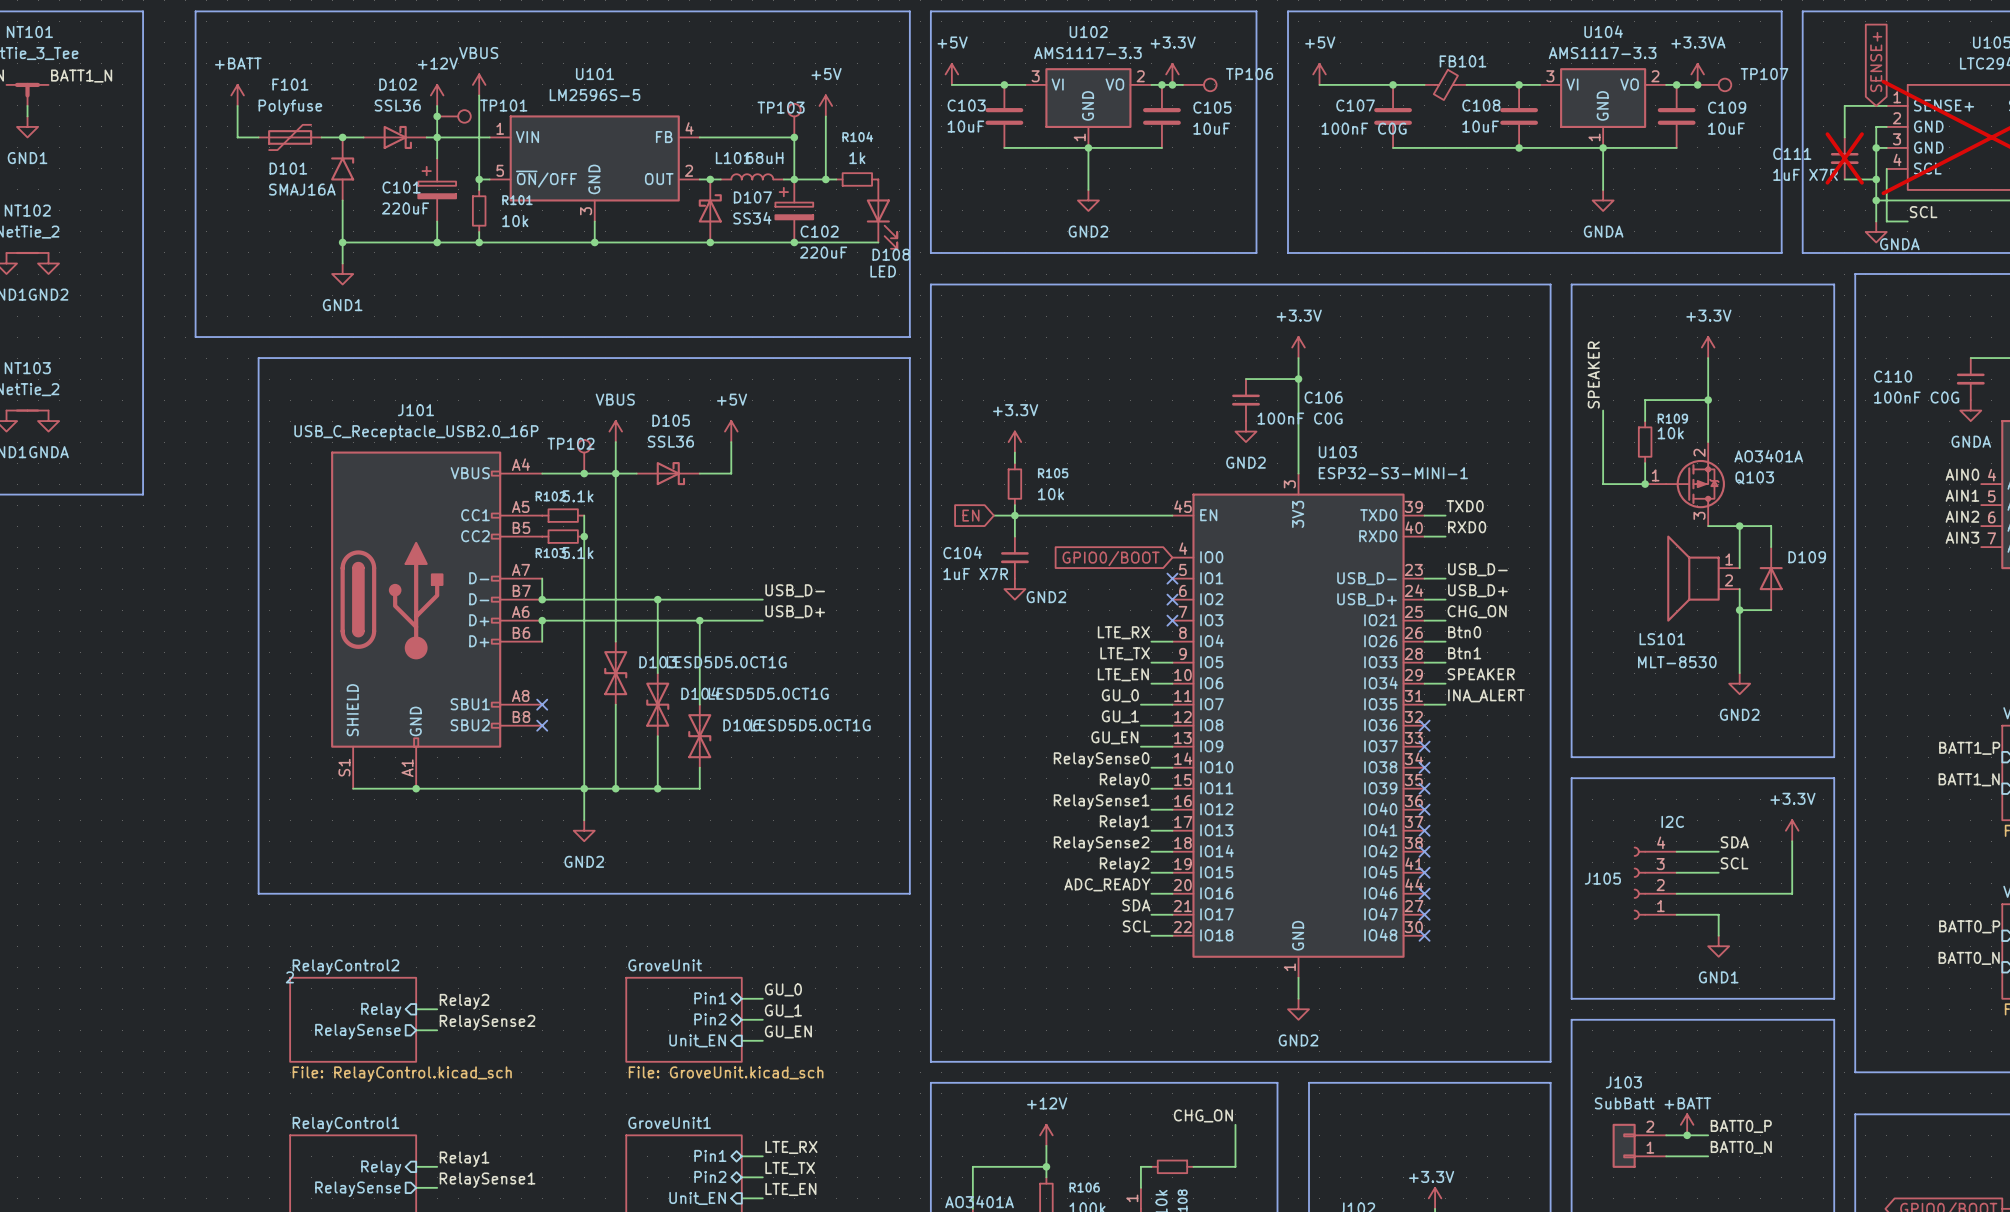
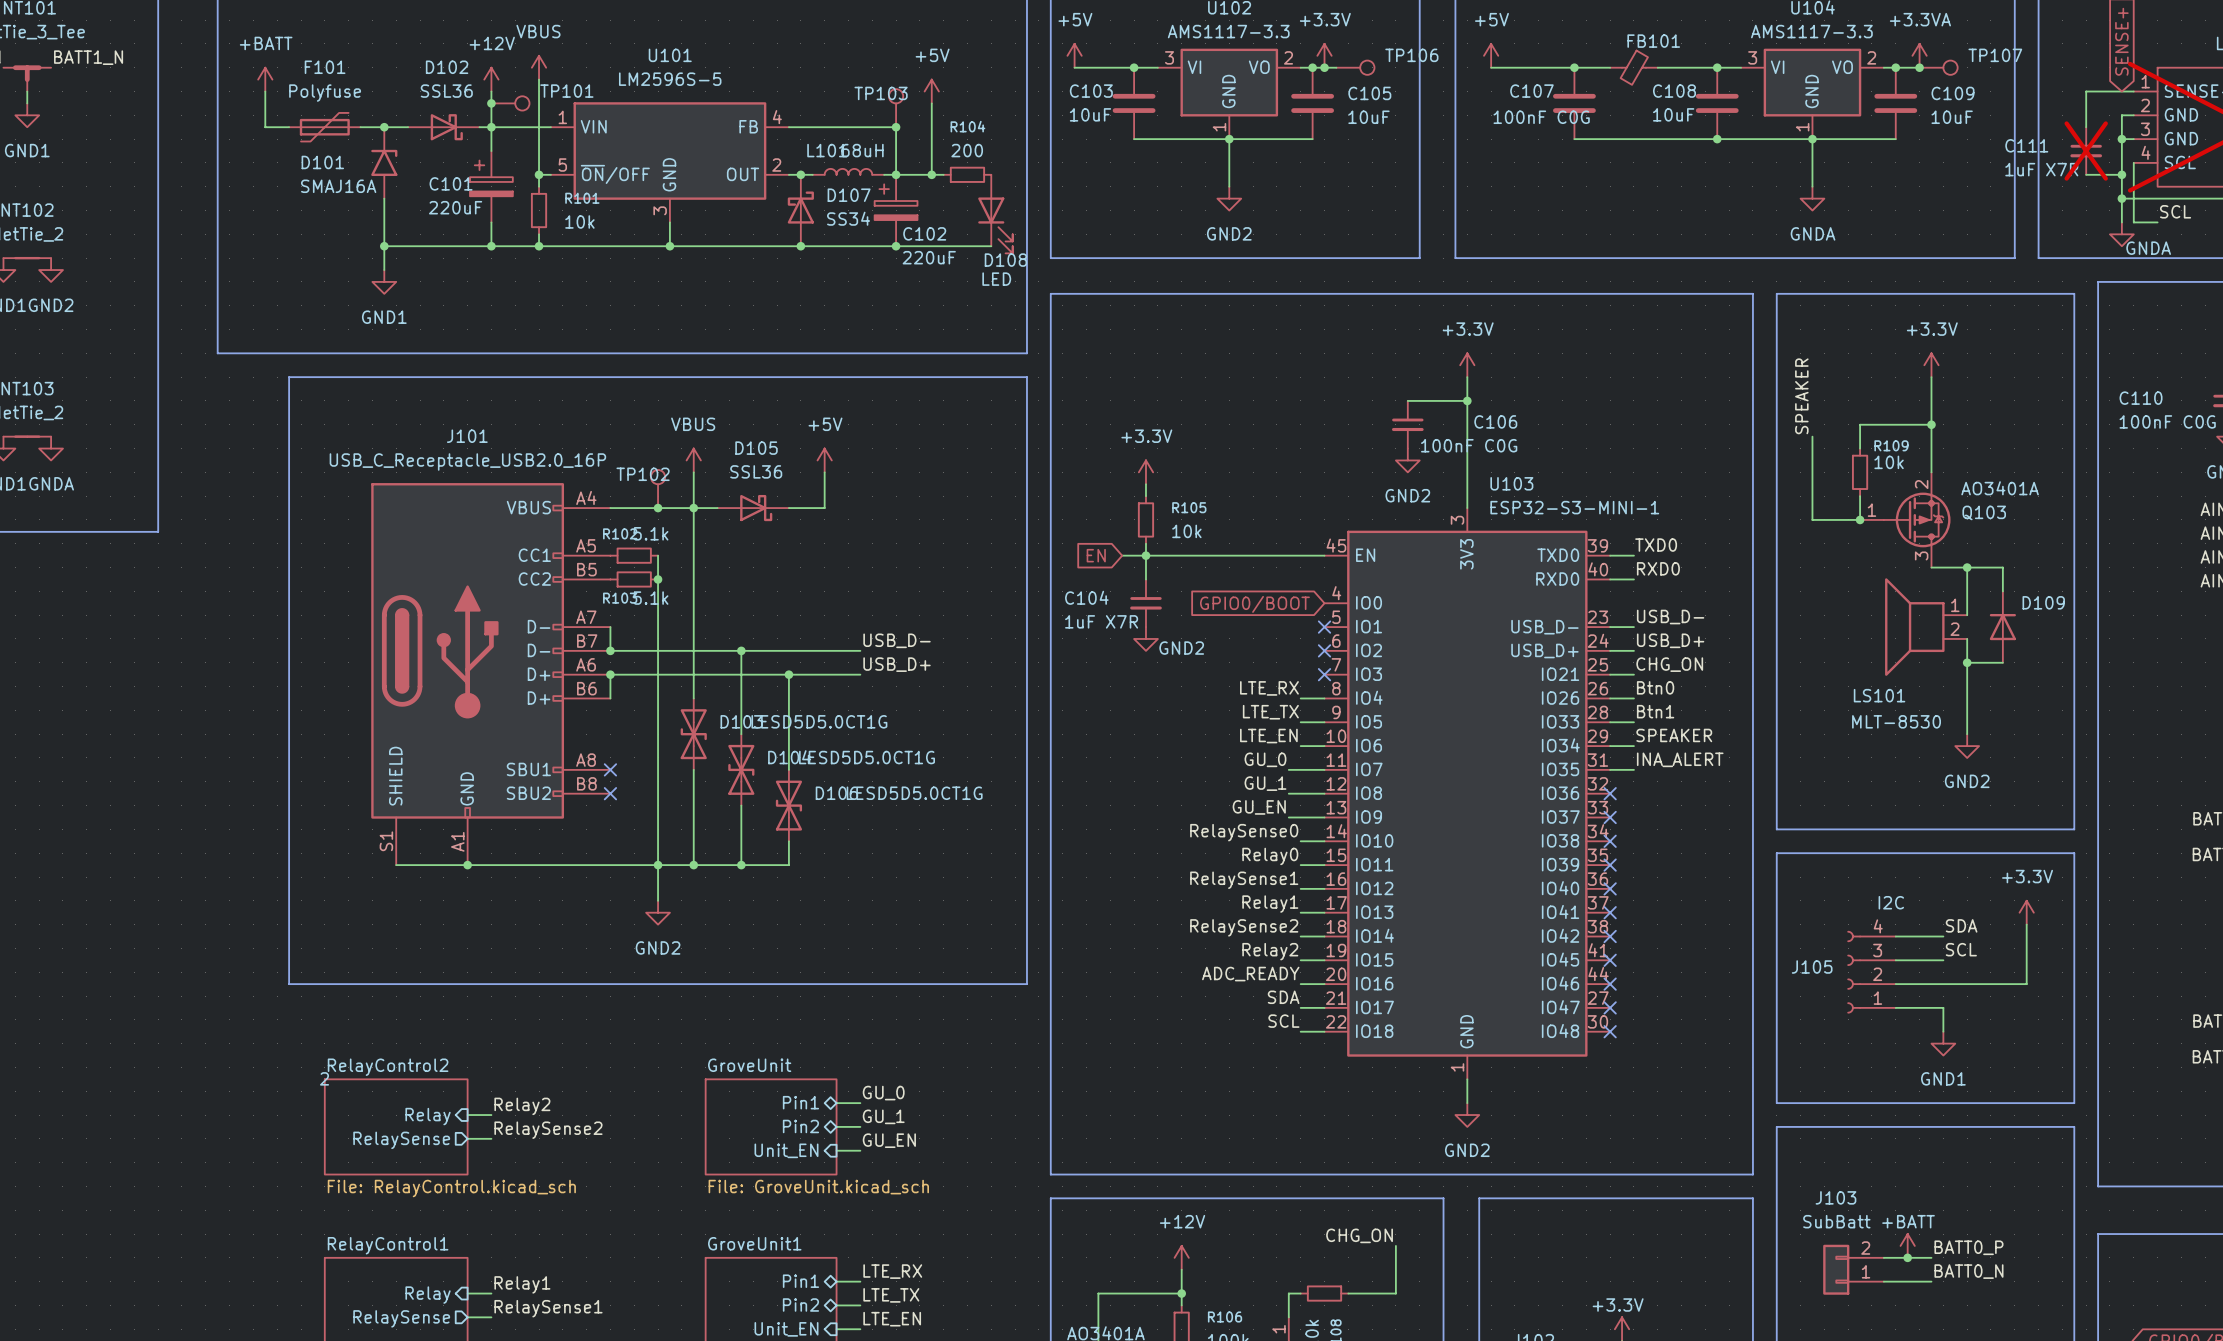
R104 value: 1k (857, 158) -> 200 (967, 150)

